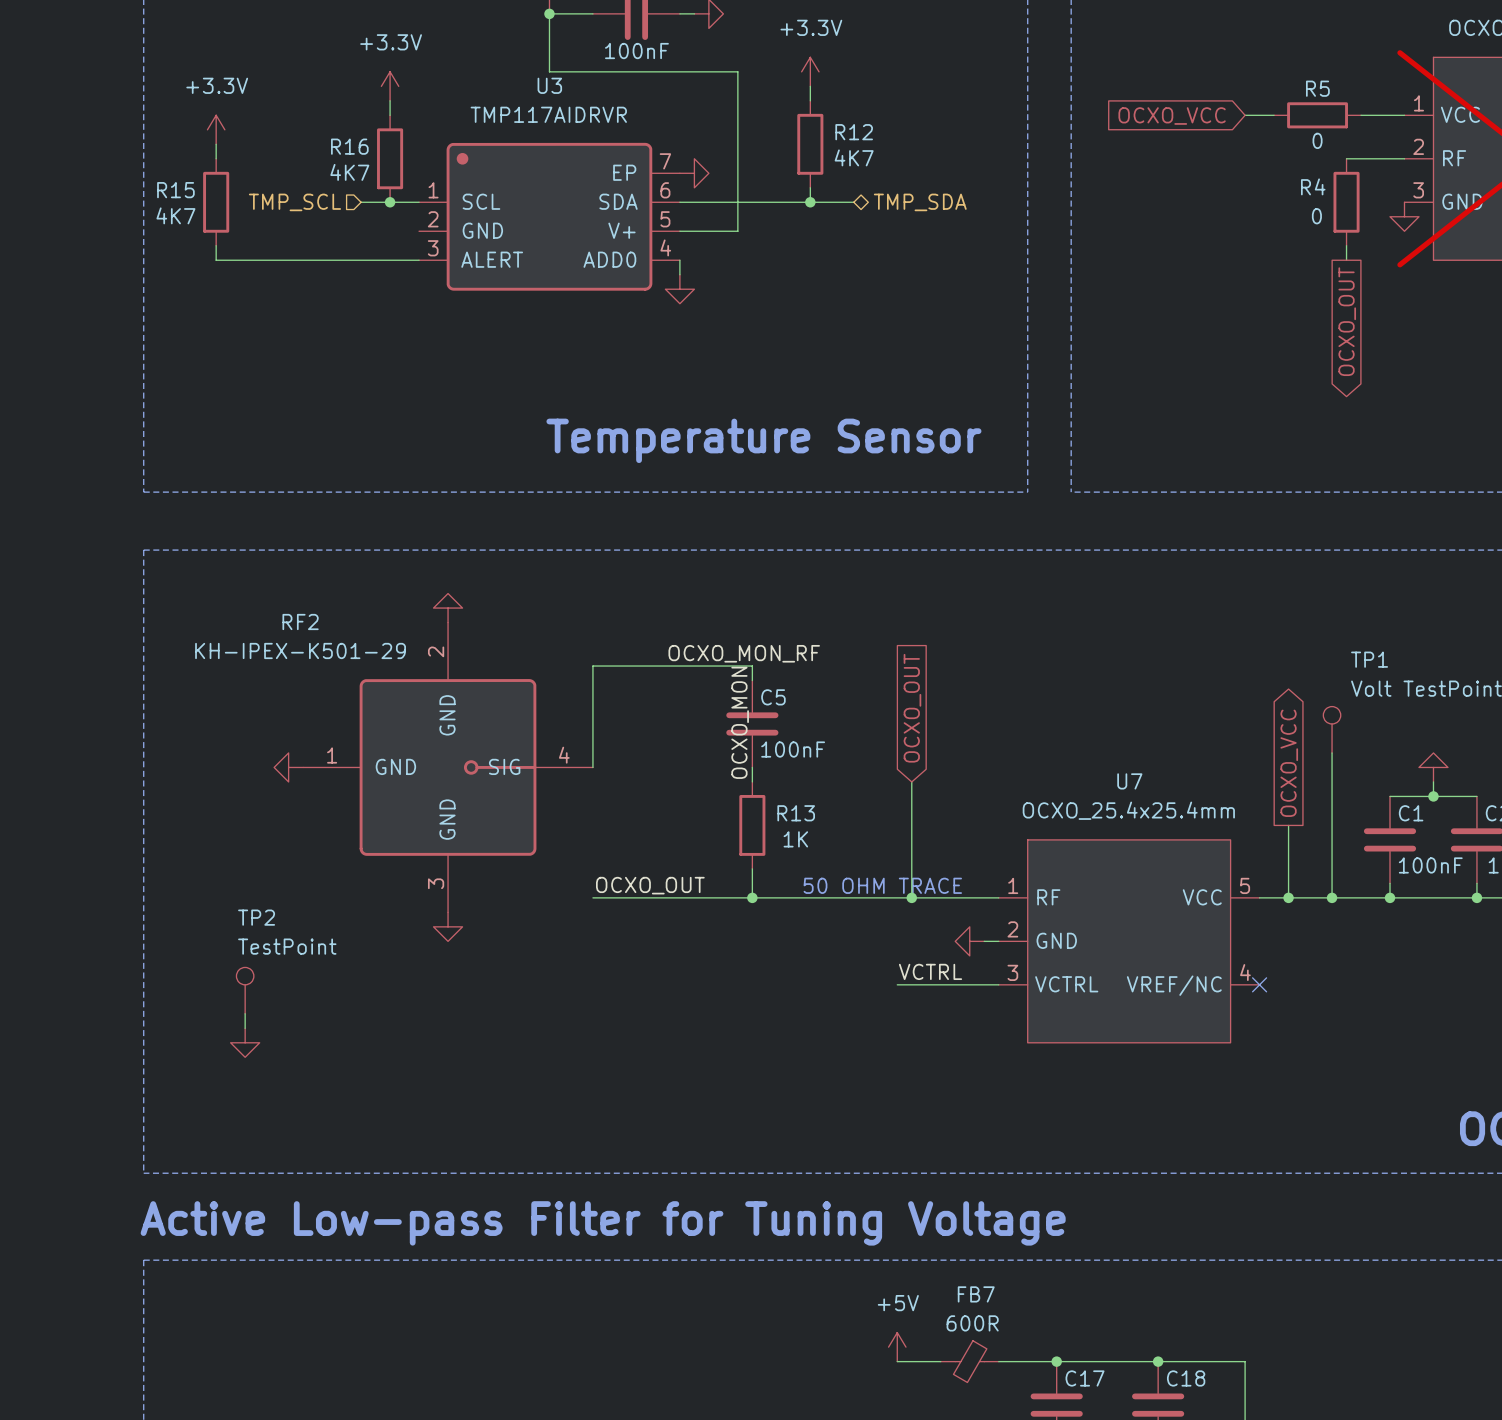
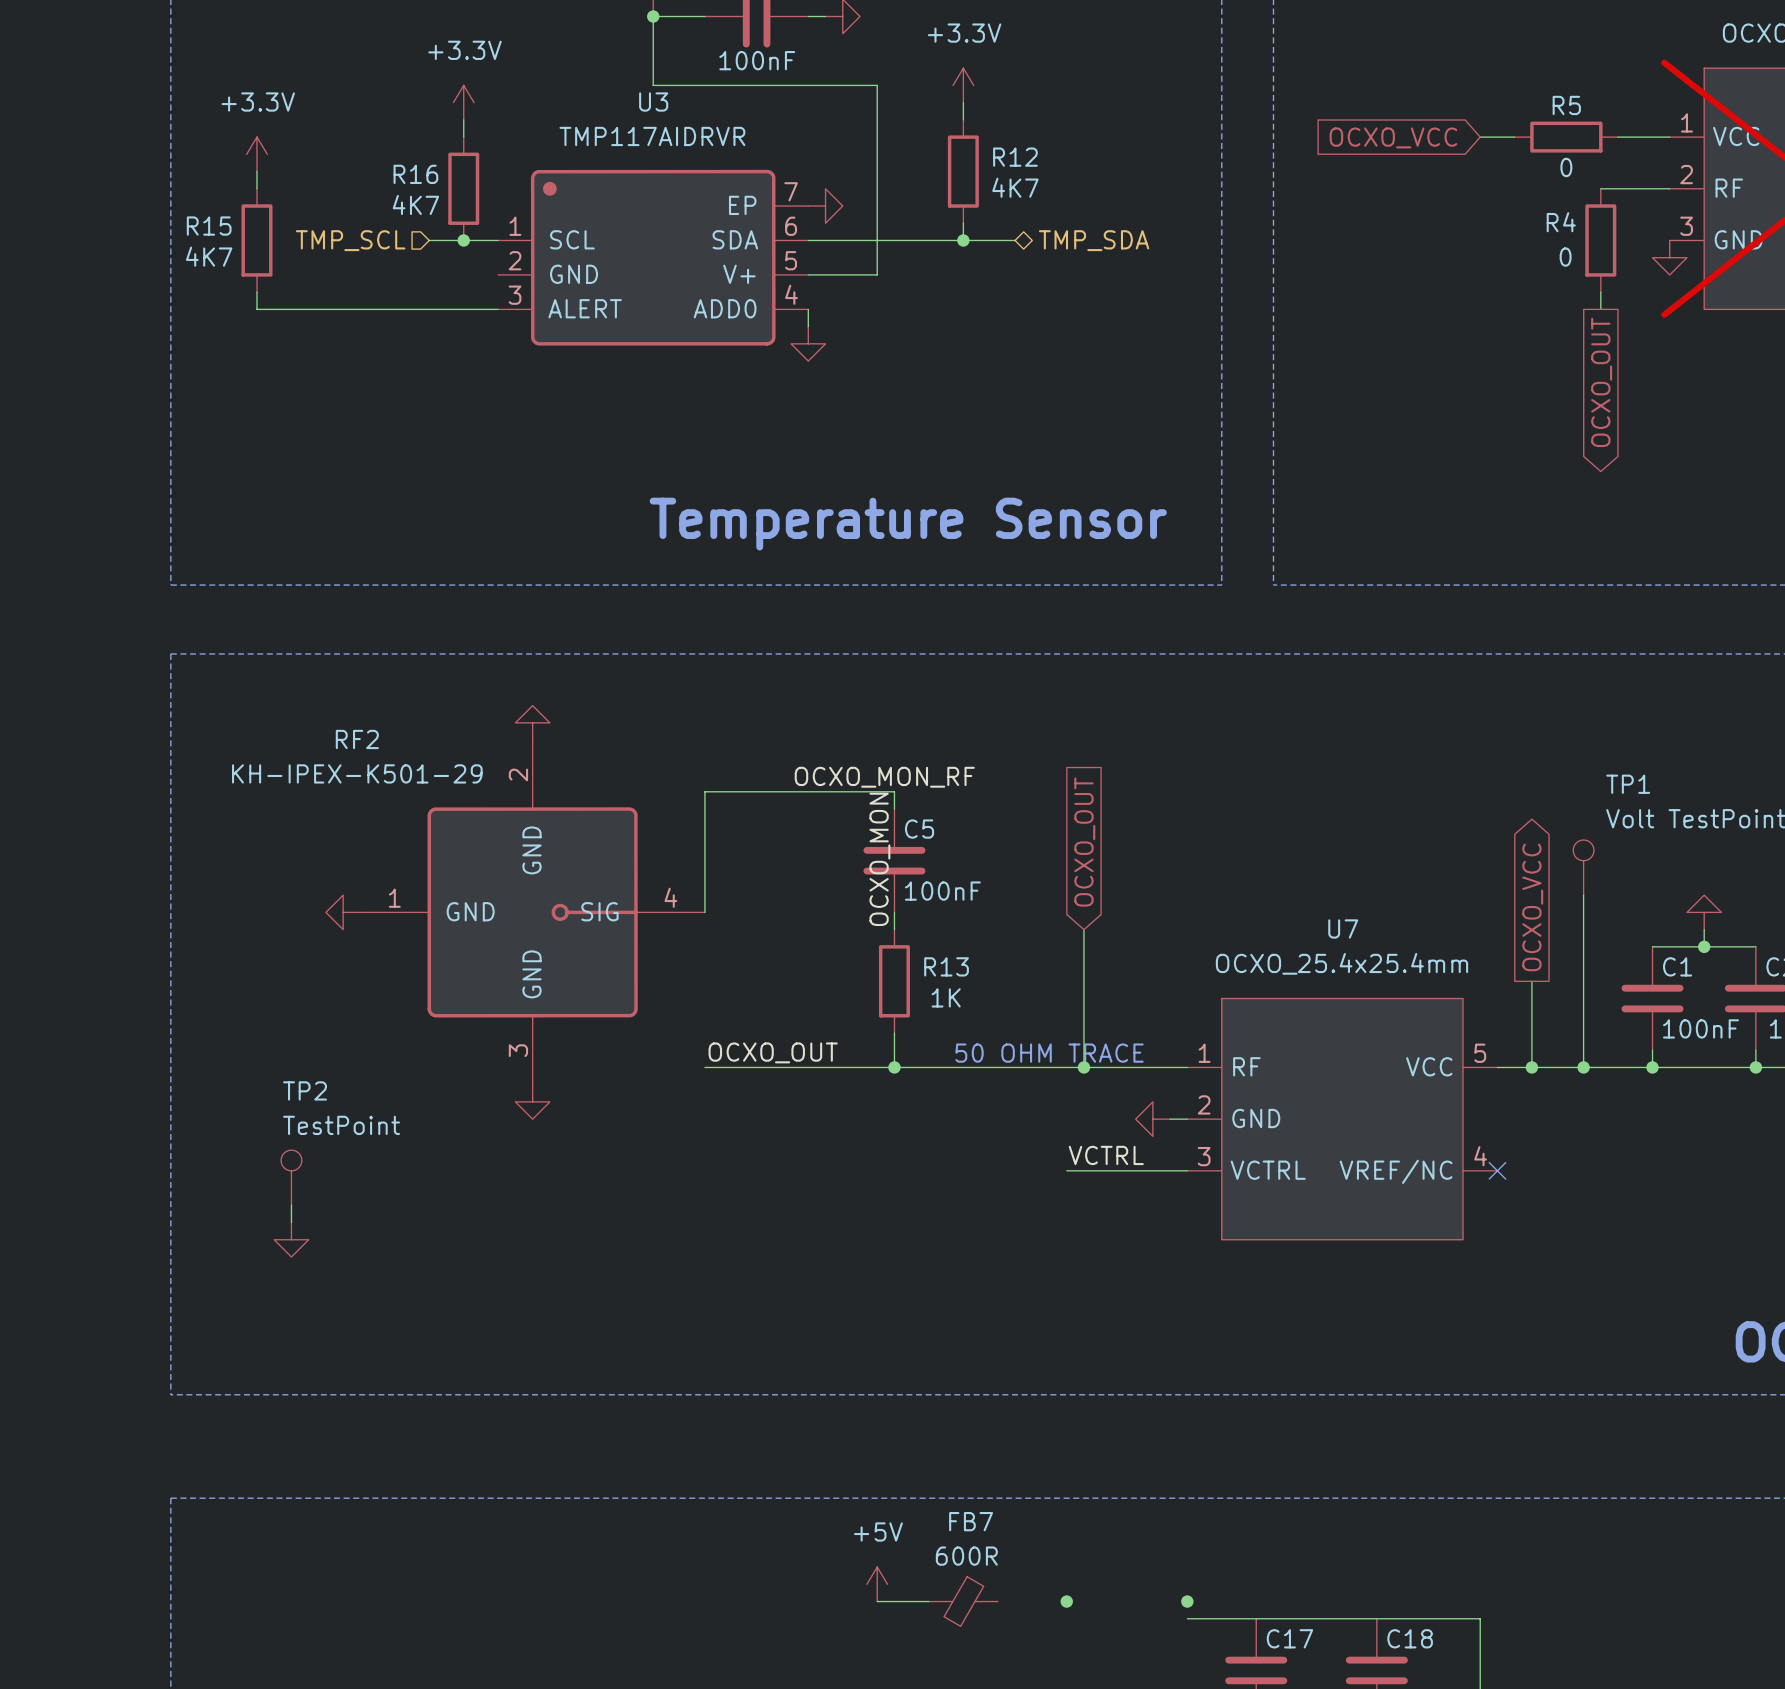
text: Active Low-pass Filter for Tuning Voltage (603, 1223) -> none
junction: none -> (1066, 1601)
power symbol position: +5V (897, 1347) -> +5V (877, 1584)
wire: (897, 1361) (940, 1361) -> (877, 1601) (928, 1601)
FB7 position: (969, 1361) -> (963, 1601)
junction position: (1056, 1361) -> (1187, 1601)
junction: (1158, 1361) -> none

